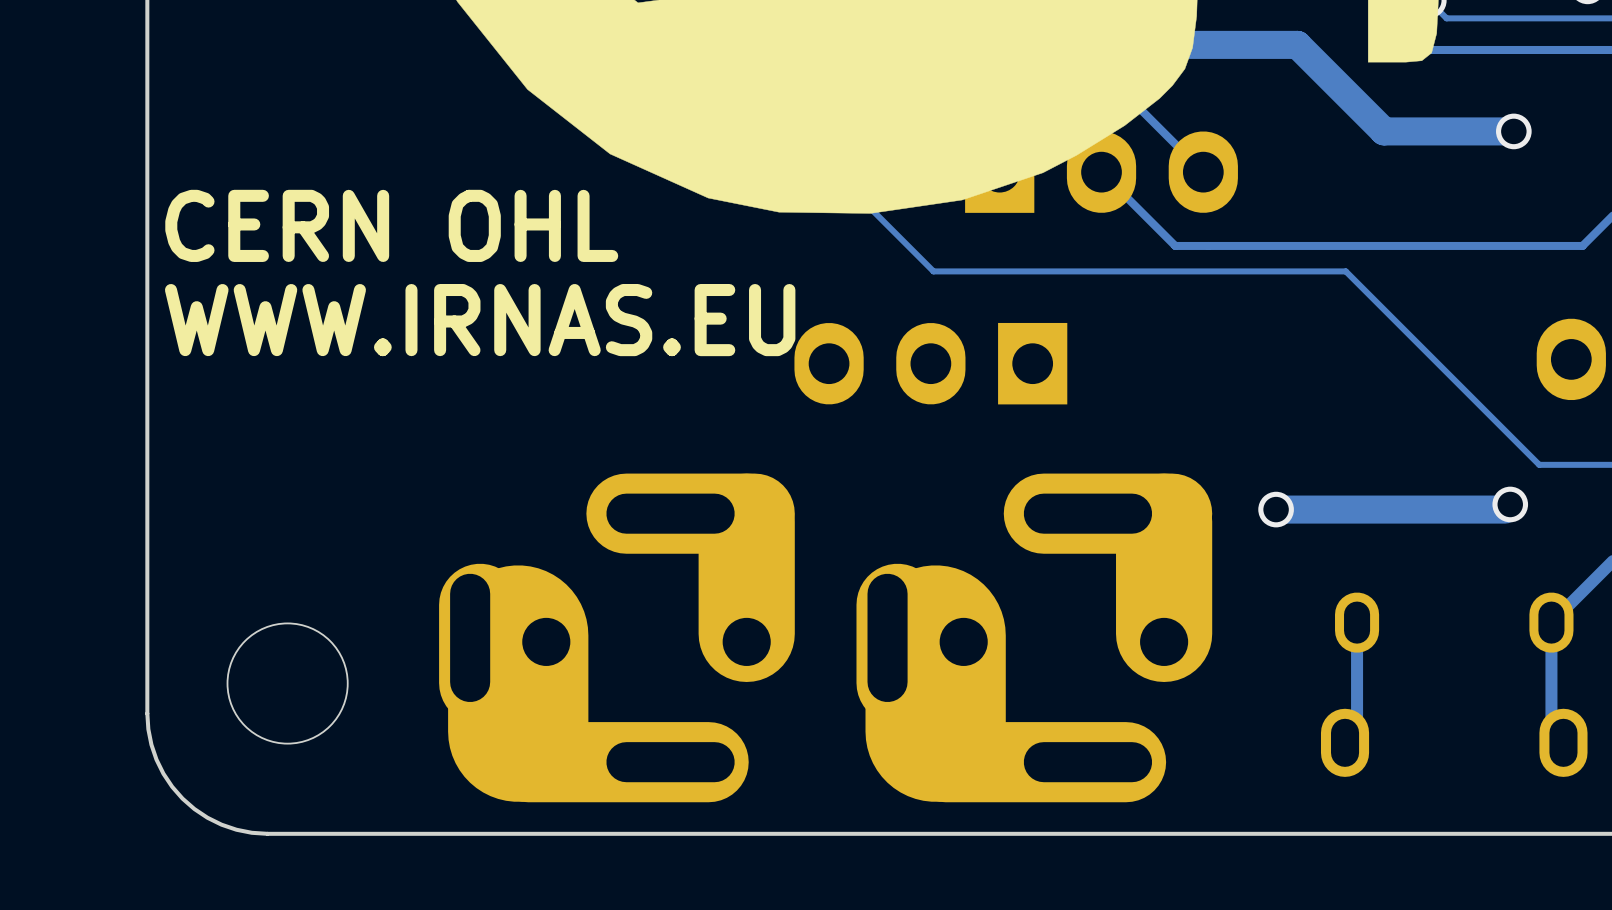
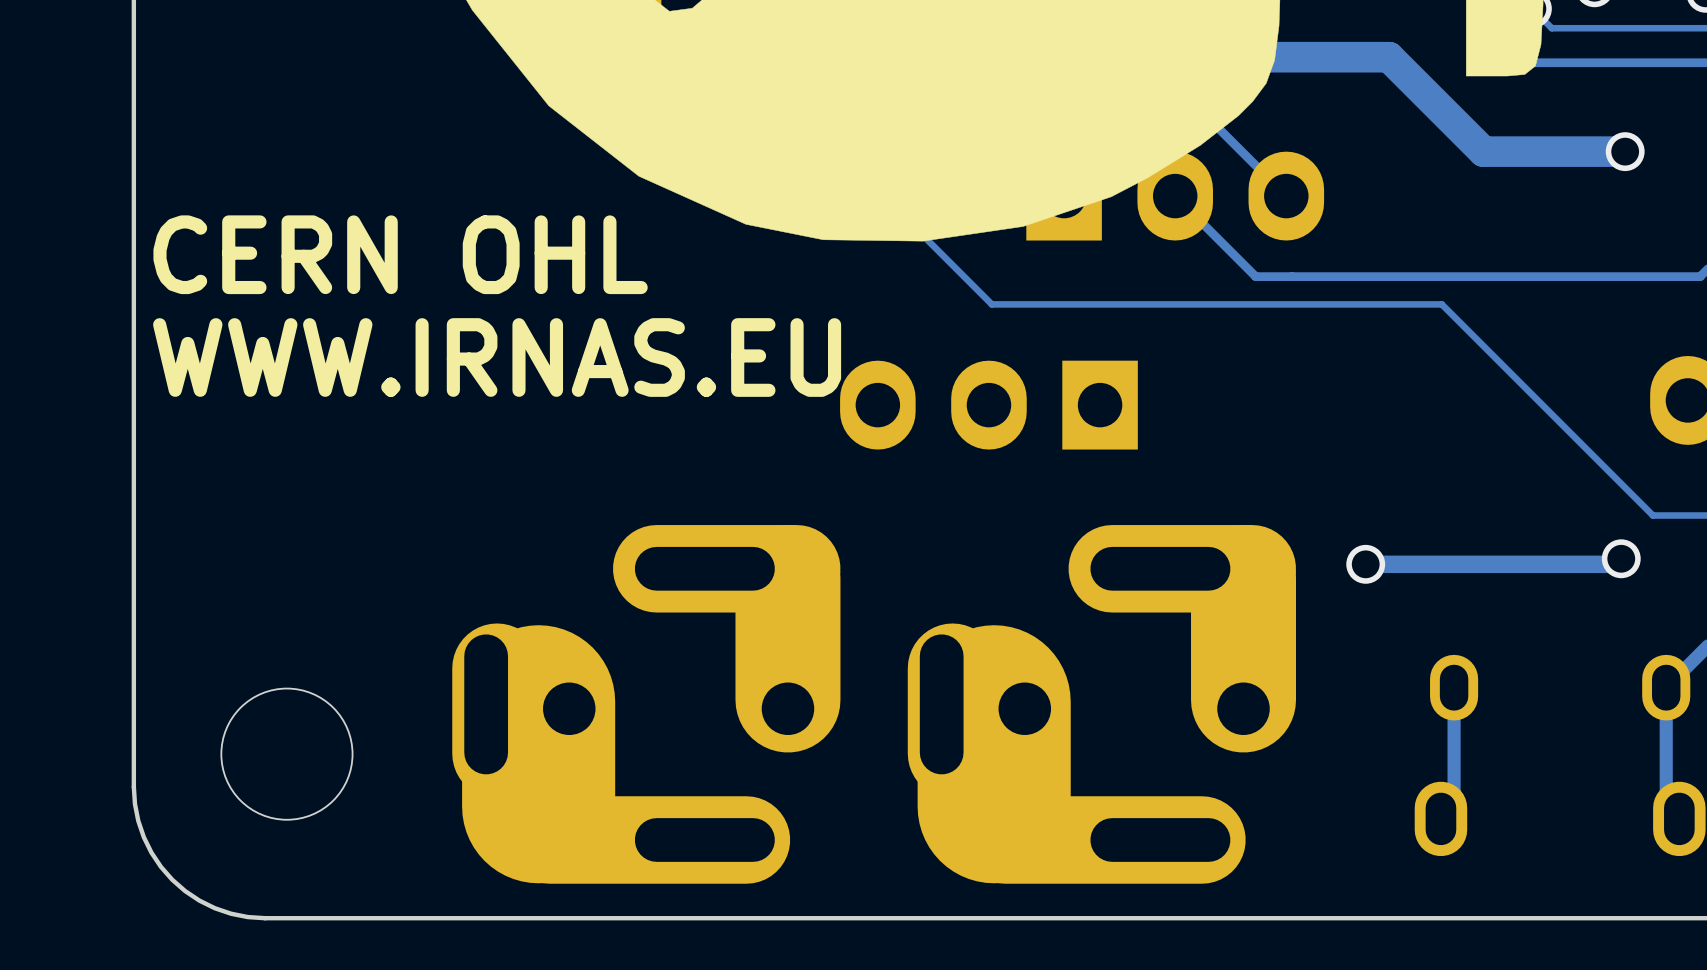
track width: thick (1505, 509) (1276, 509) -> thin (1615, 564) (1365, 564)

